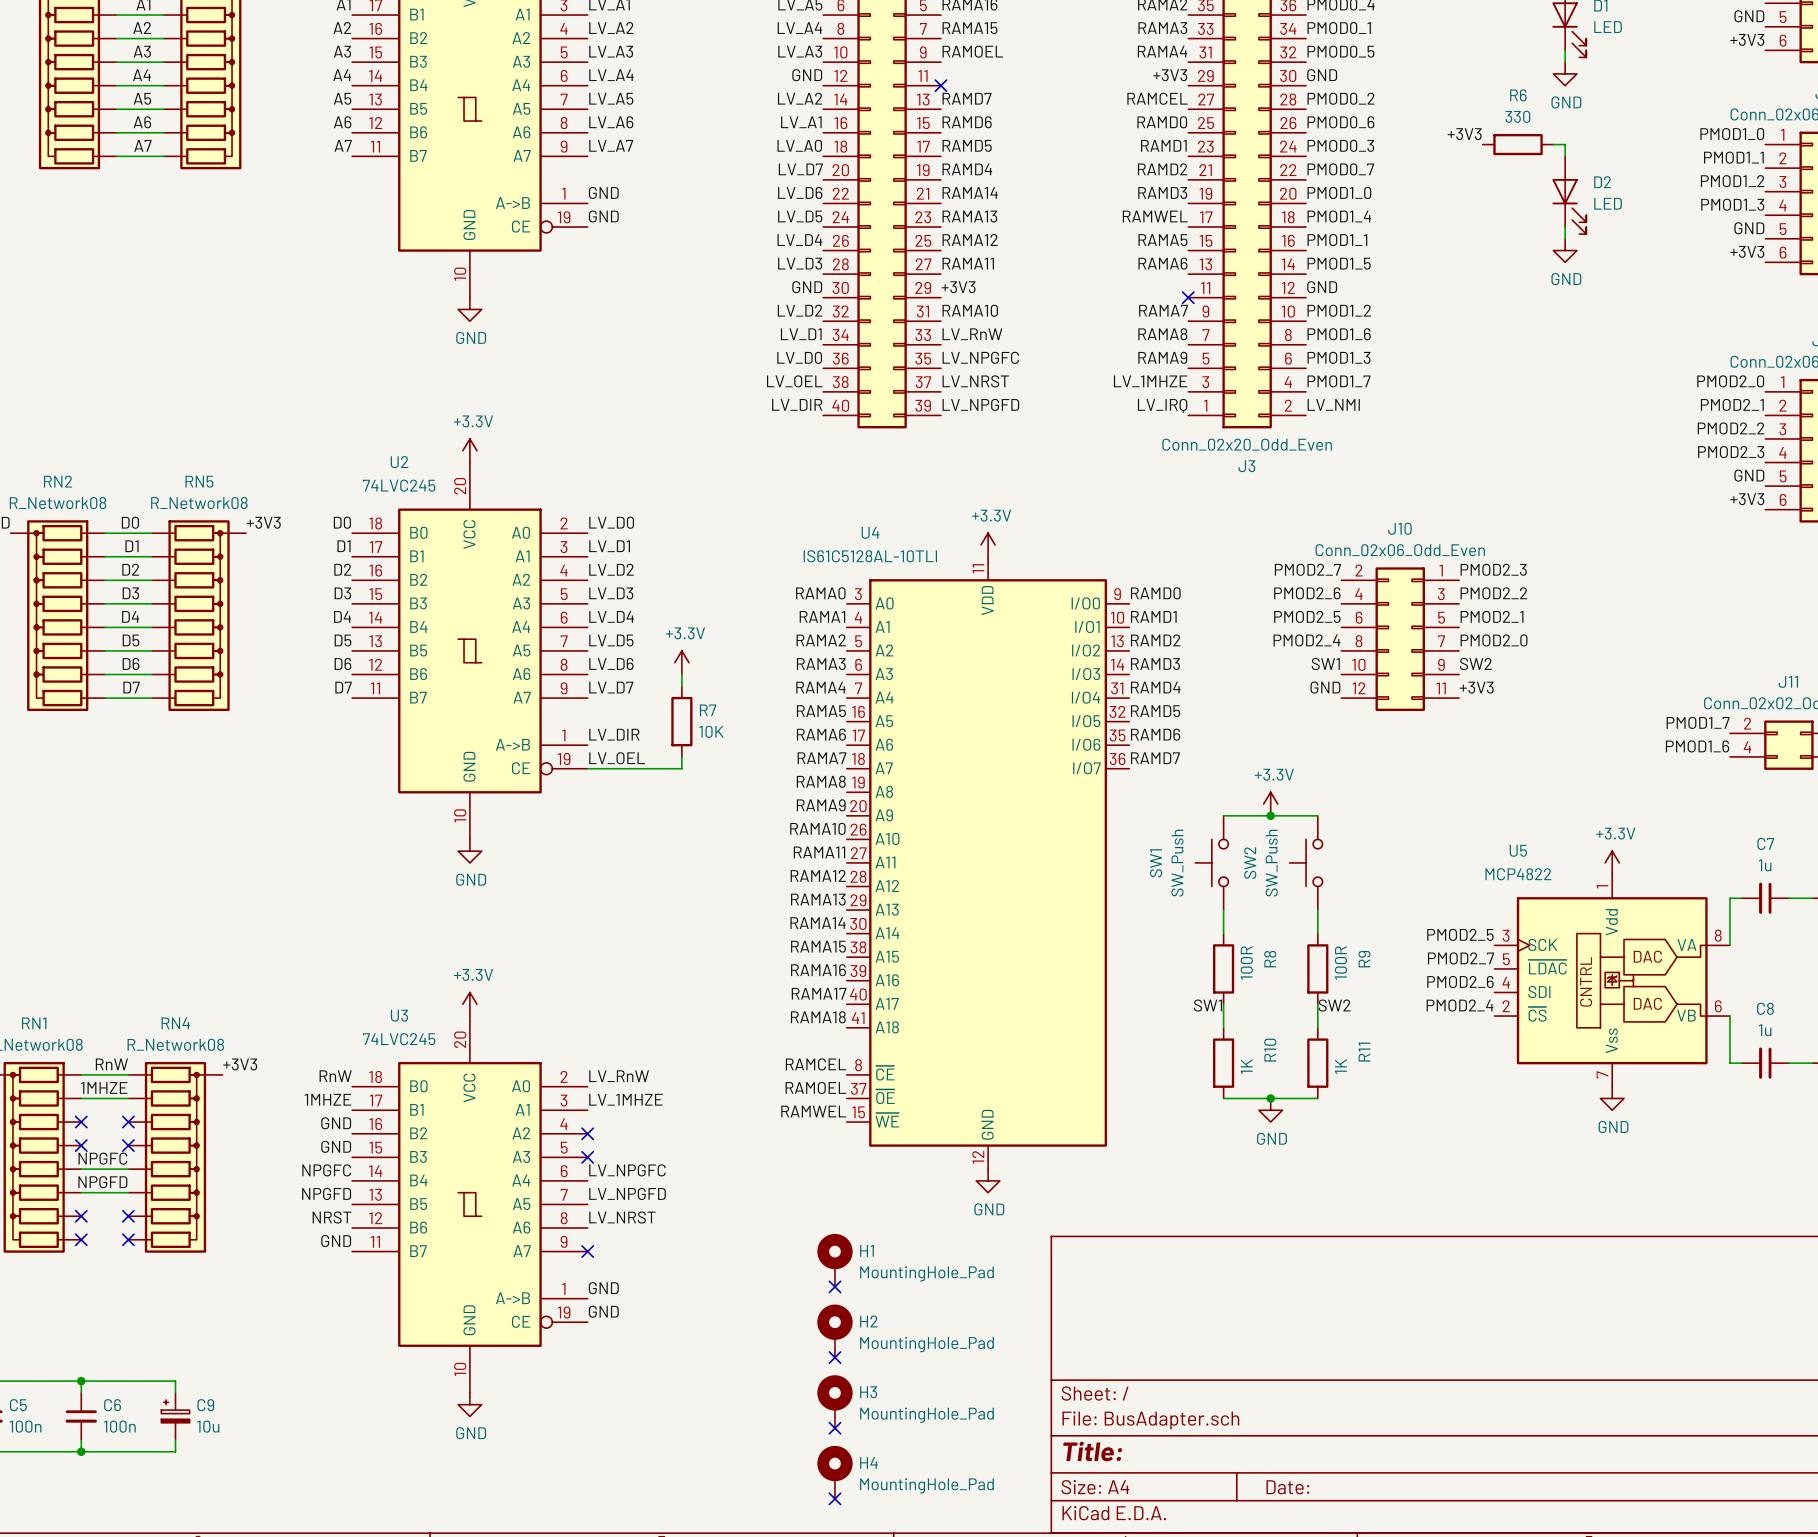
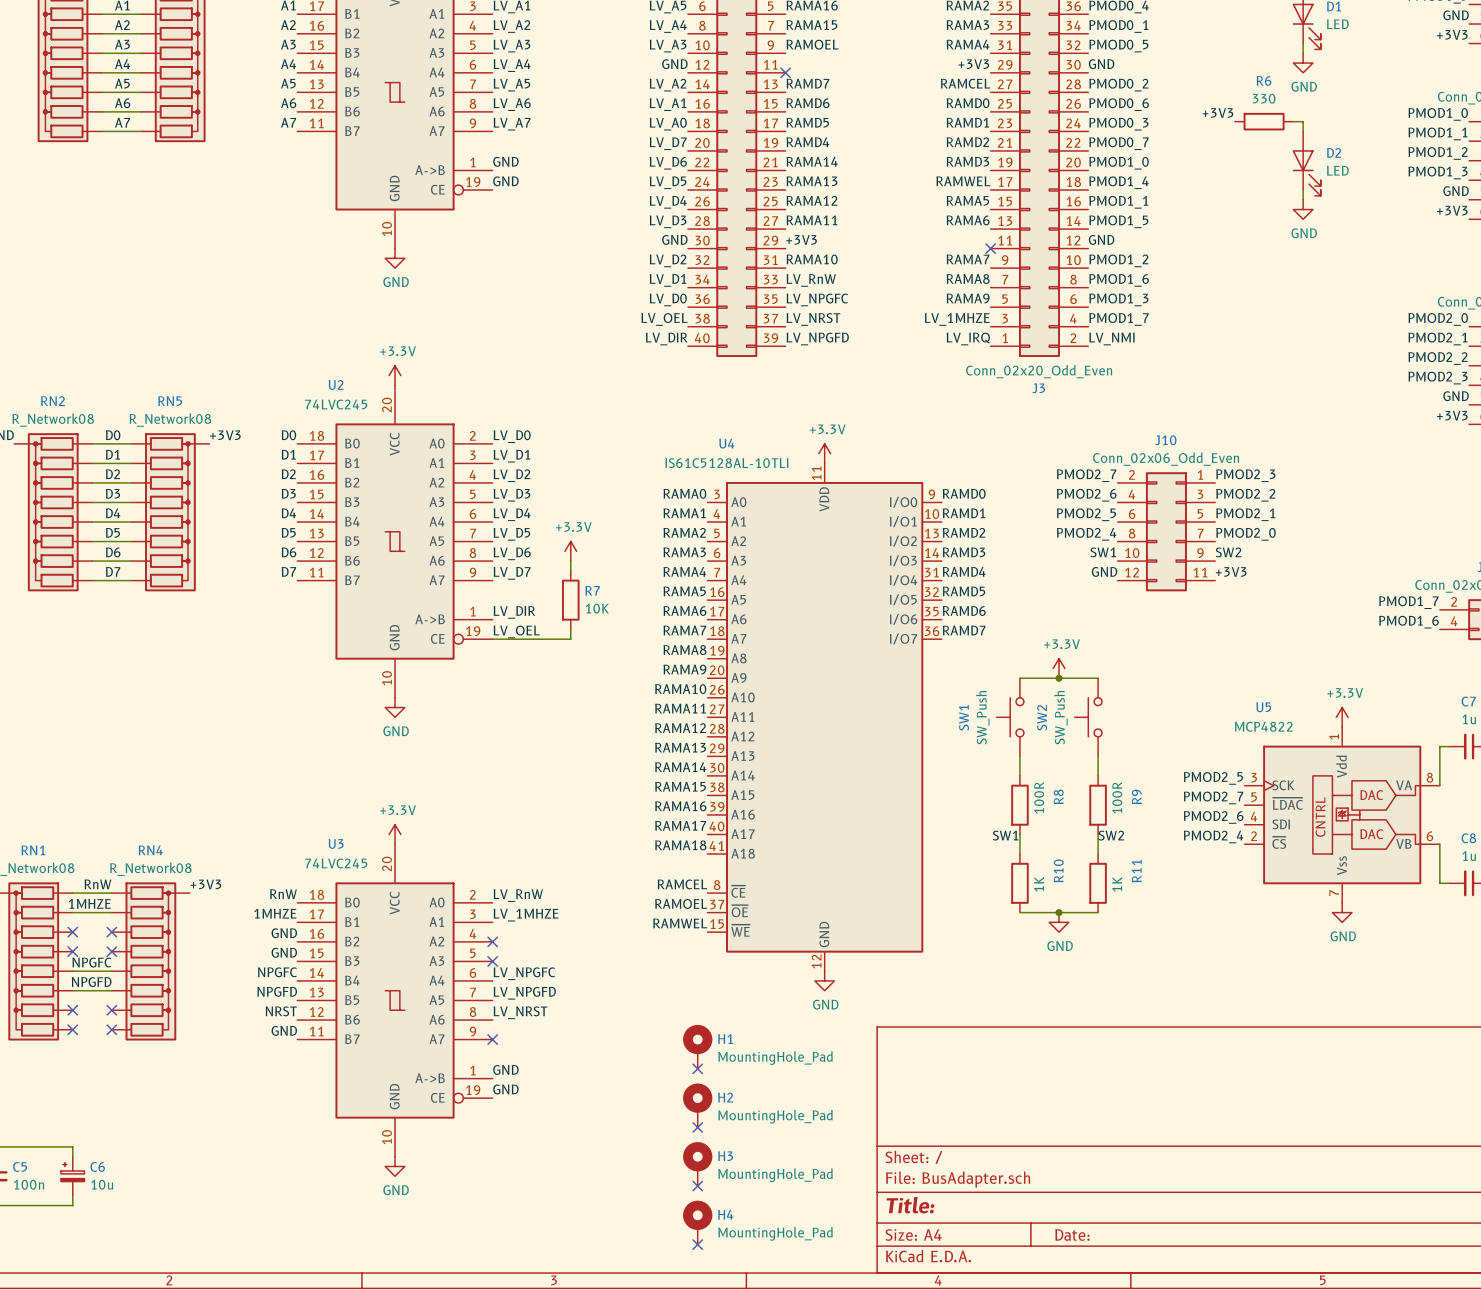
wire: (81, 1381) (175, 1381) (175, 1392) -> none
junction: (81, 1381) -> none
C6 symbol: [65, 1392, 97, 1440] -> [61, 1156, 85, 1196]
C9: 10u (175, 1416) -> none
C6 value: 100n (119, 1426) -> 10u (102, 1184)
wire: (175, 1439) (175, 1451) (81, 1451) -> none
junction: (81, 1451) -> none

